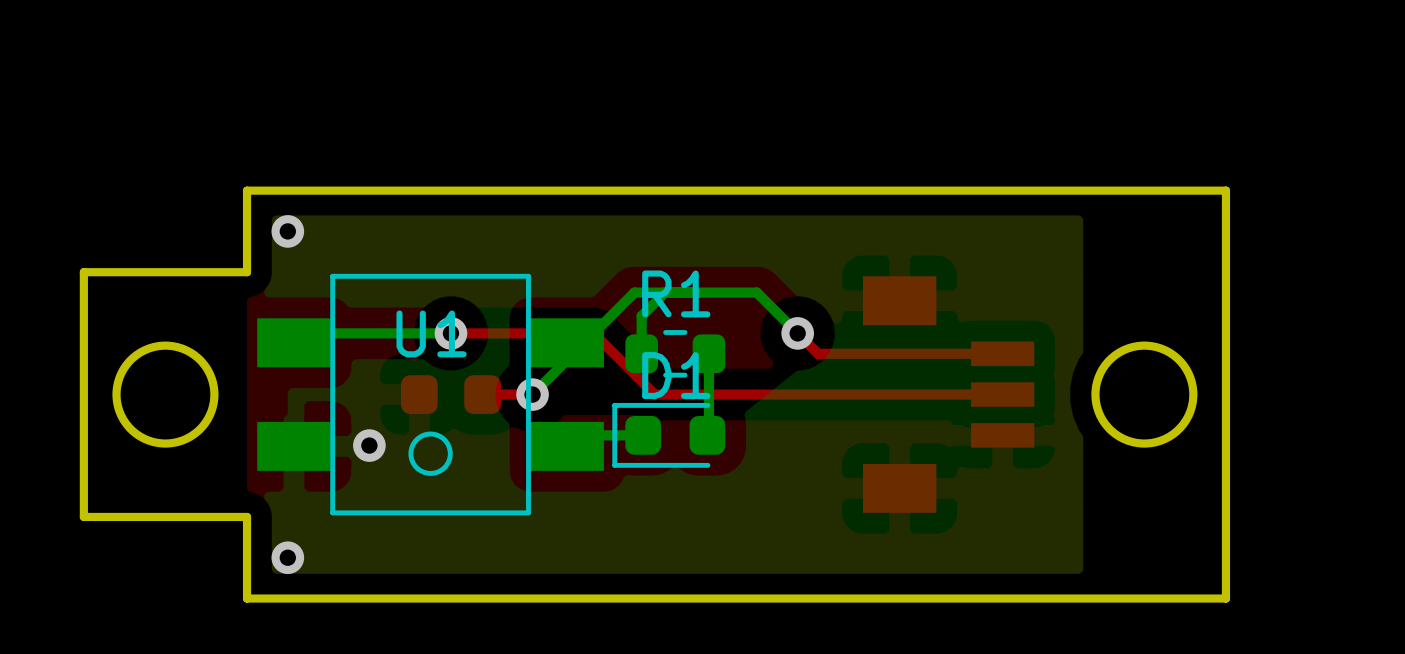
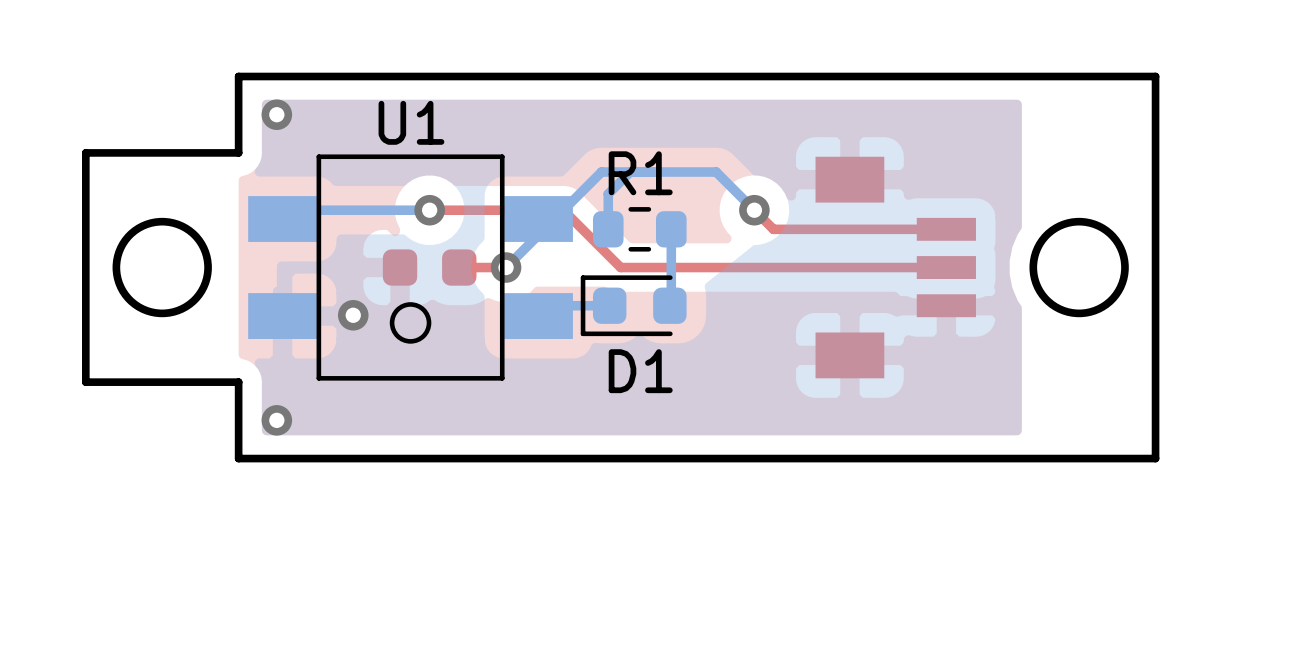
U1 name position: U1 (431, 333) -> U1 (411, 122)
D1 name position: D1 (676, 375) -> D1 (640, 371)

